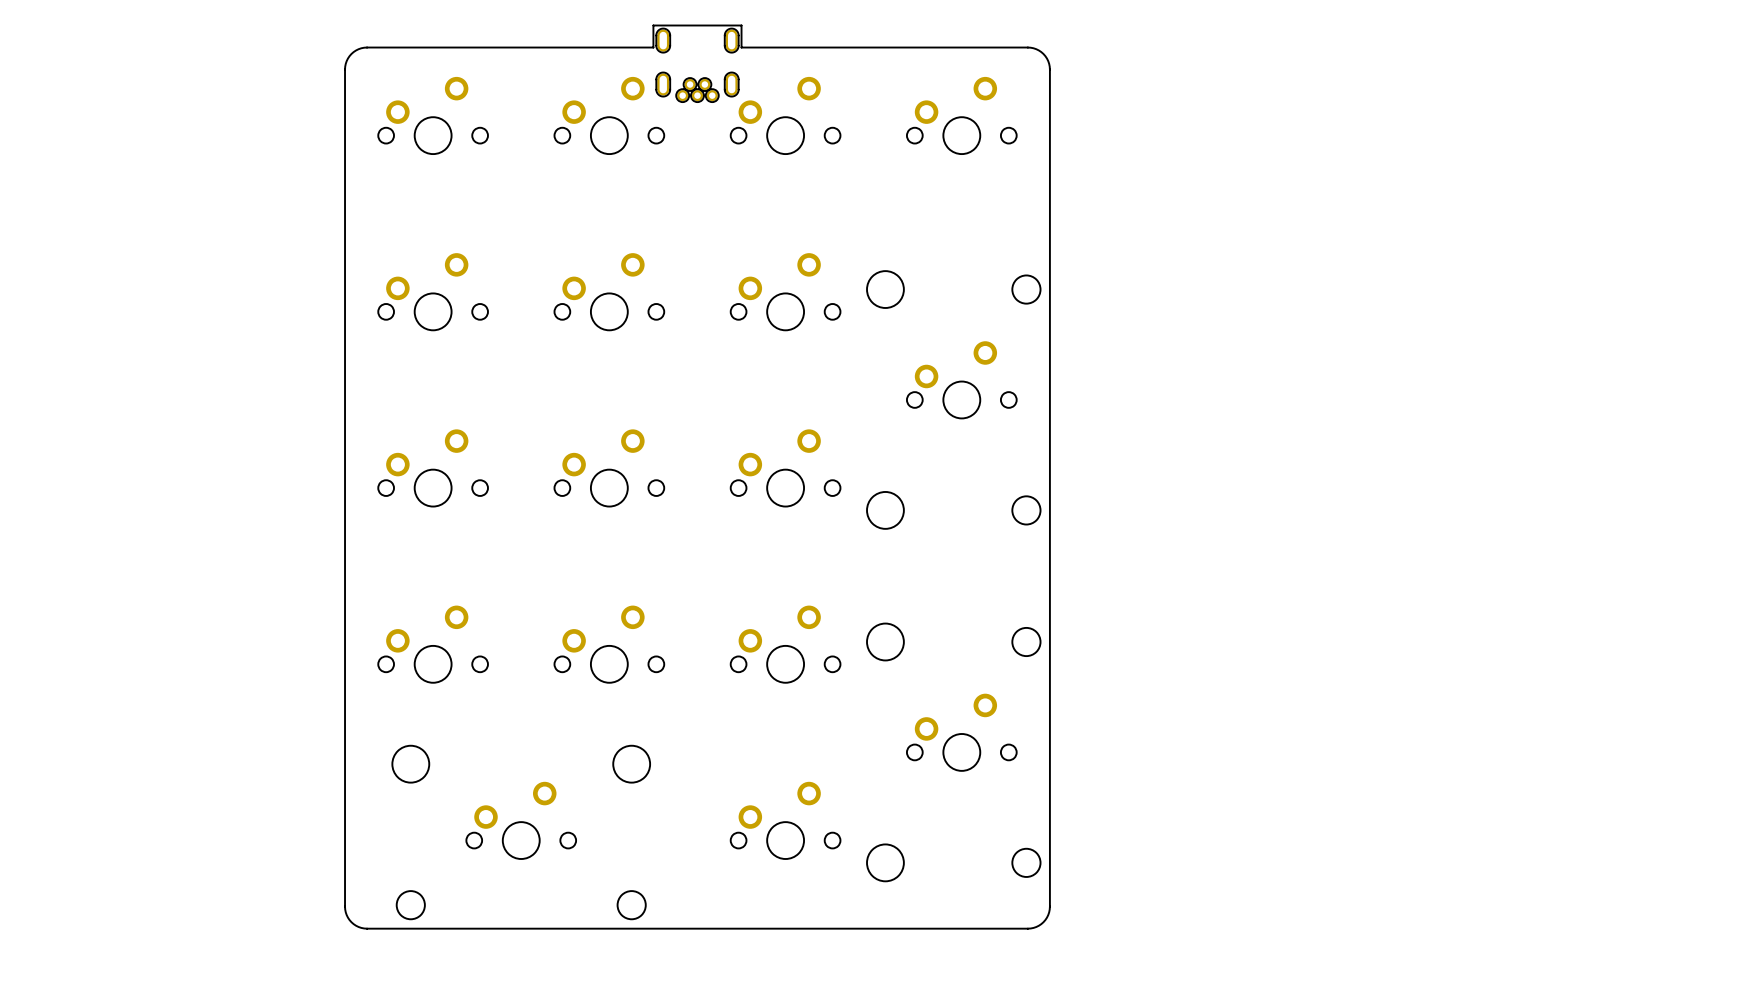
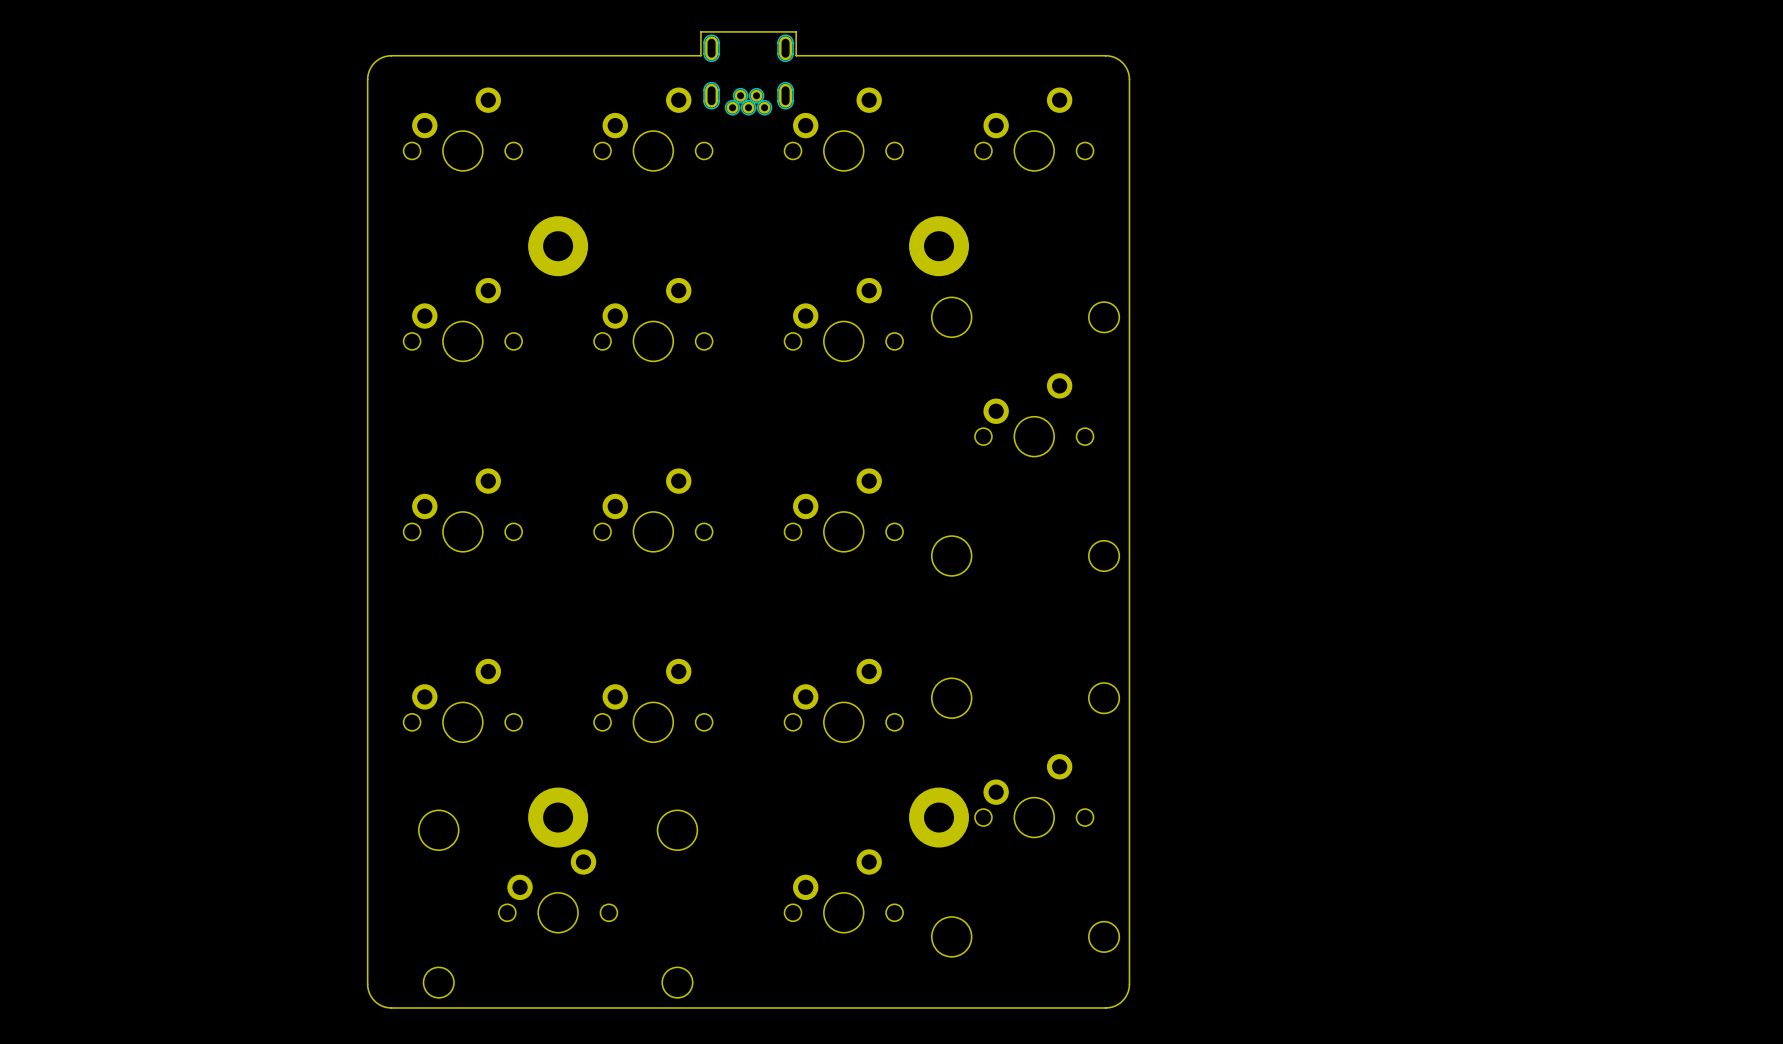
part: none -> (558, 246)
part: none -> (939, 246)
part: none -> (558, 817)
part: none -> (939, 817)

